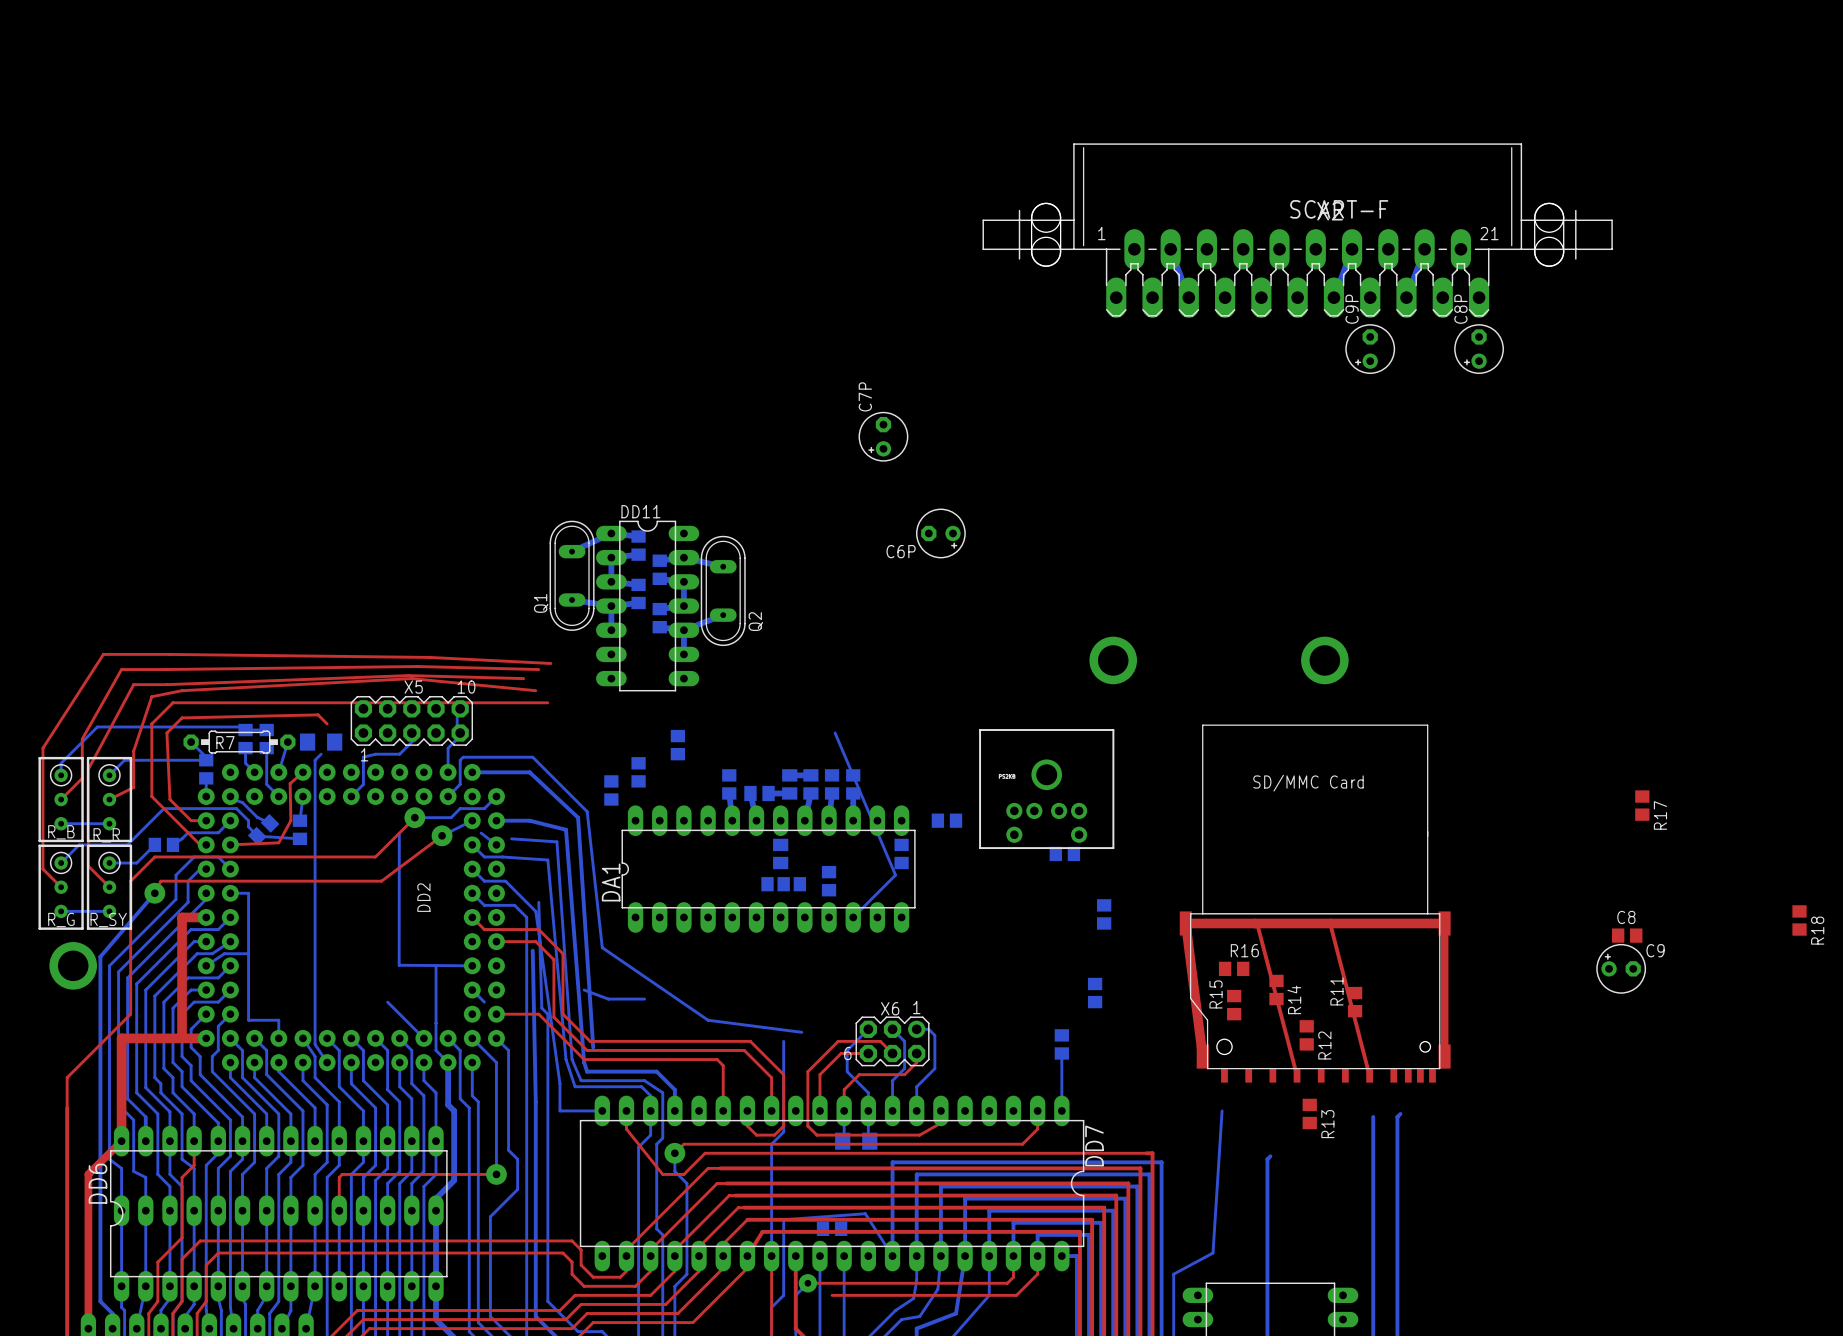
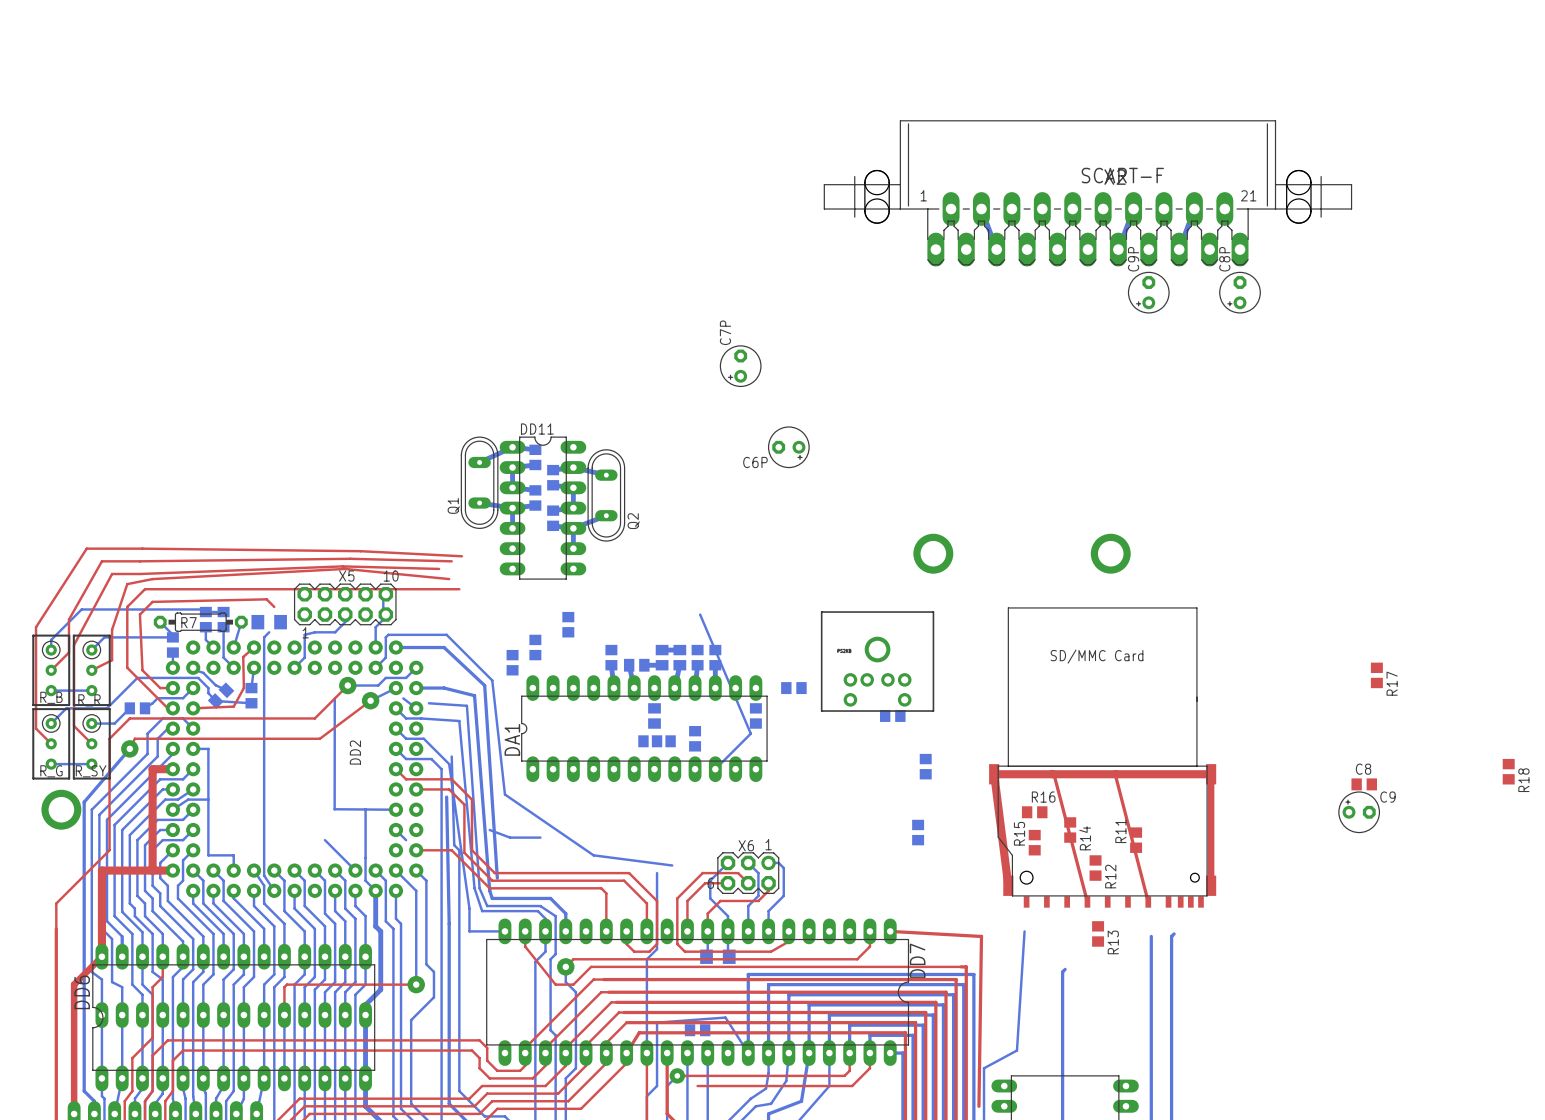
part: (1061, 1044) -> none
bottom track: (1061, 1053) (1061, 1110) -> none
top track: none -> (890, 931) (981, 936) (978, 1106)

